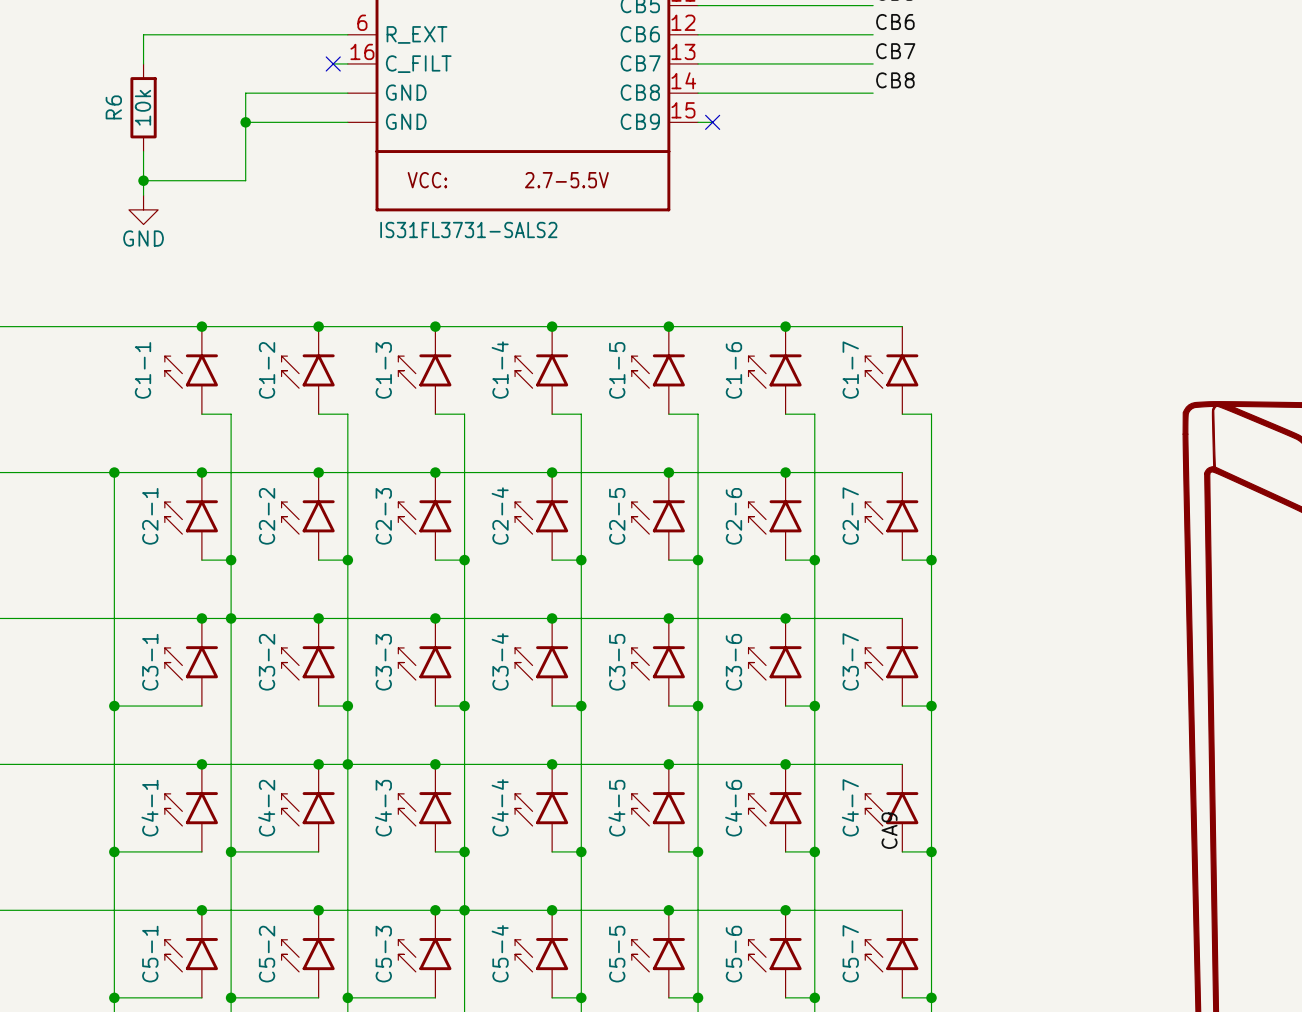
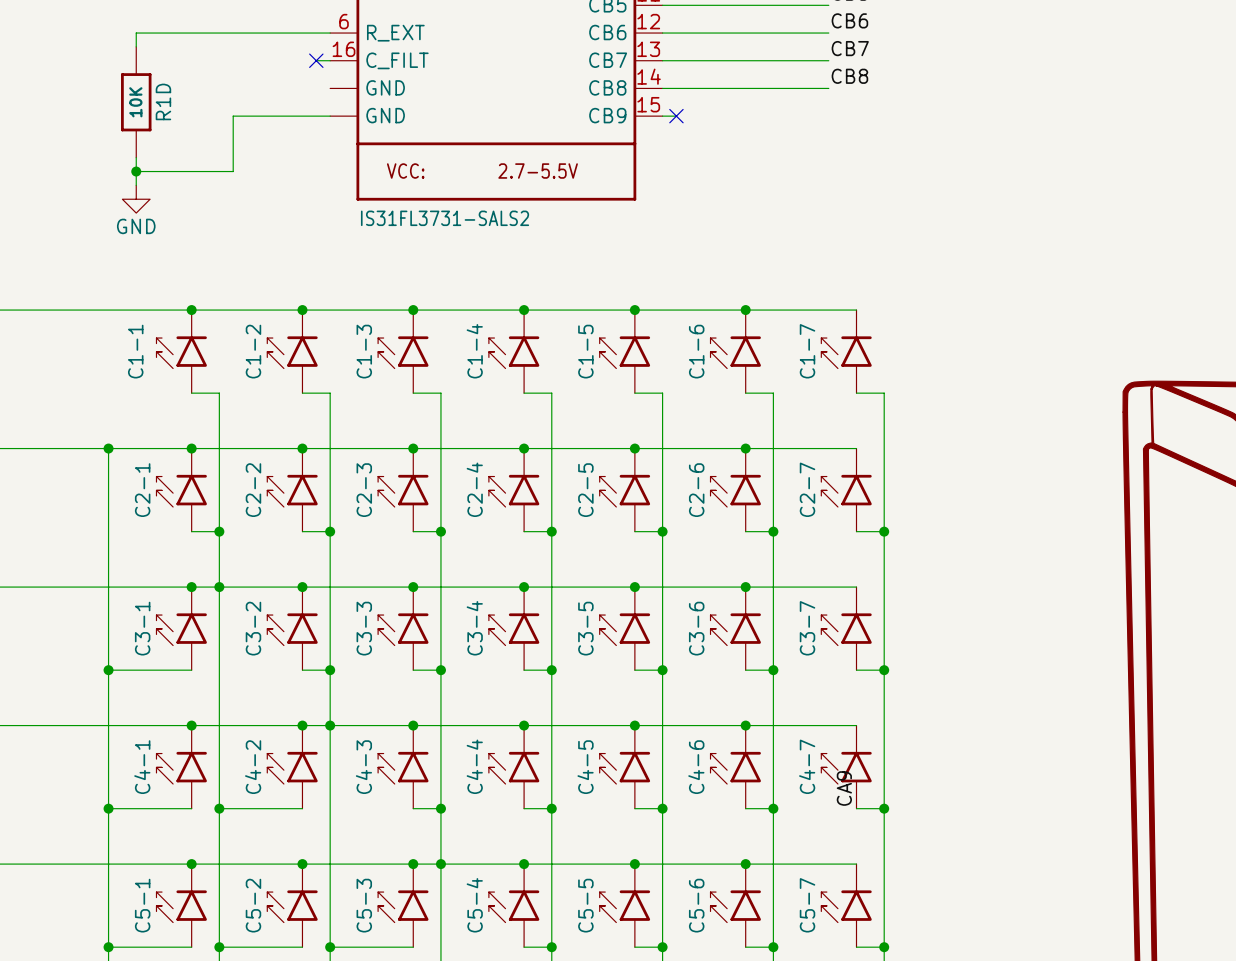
wire: (347, 93) (245, 93) (245, 122) -> none
R6: 10k (143, 107) -> none
R1D: none -> 10K (136, 102)
junction: (245, 122) -> none

